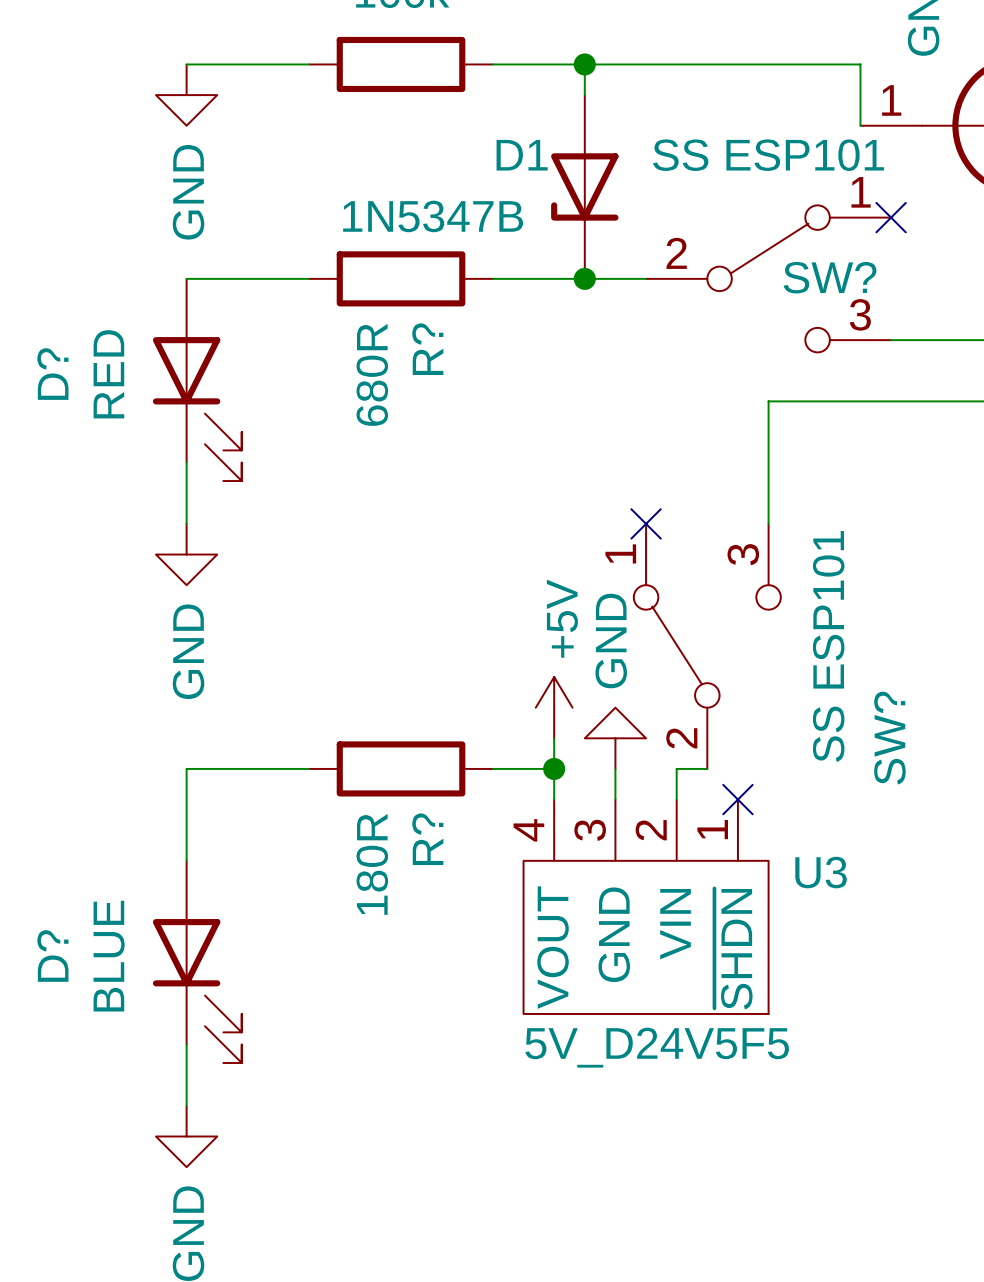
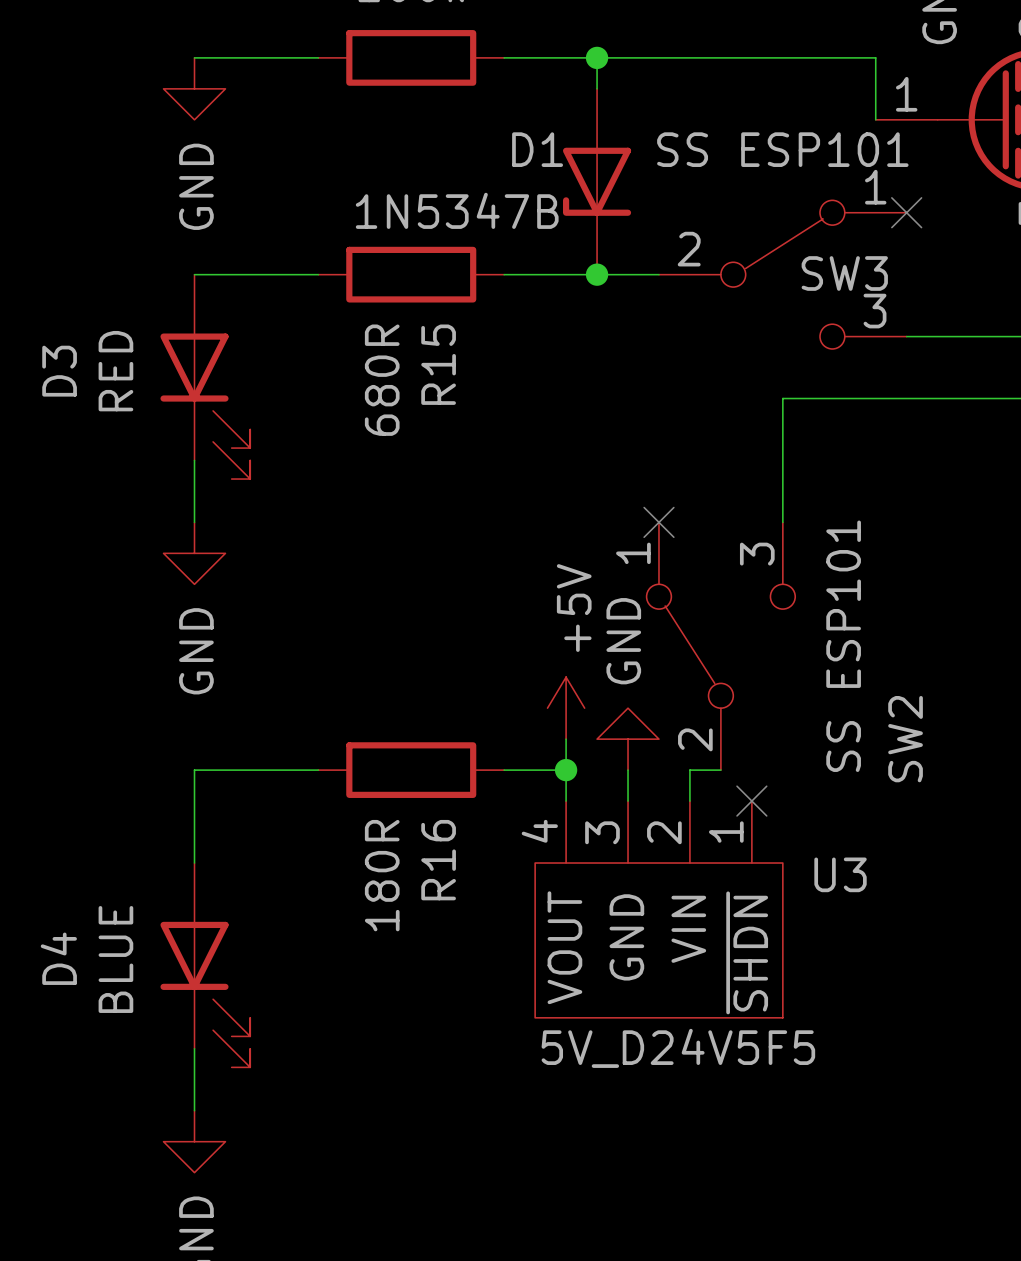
SW? name: SW? (830, 277) -> SW3 (844, 273)
R? name: R? (427, 349) -> R15 (438, 364)
D? name: D? (52, 374) -> D3 (59, 371)
SW? name: SW? (889, 738) -> SW2 (905, 739)
R? name: R? (427, 839) -> R16 (438, 860)
D? name: D? (52, 956) -> D4 (58, 958)

